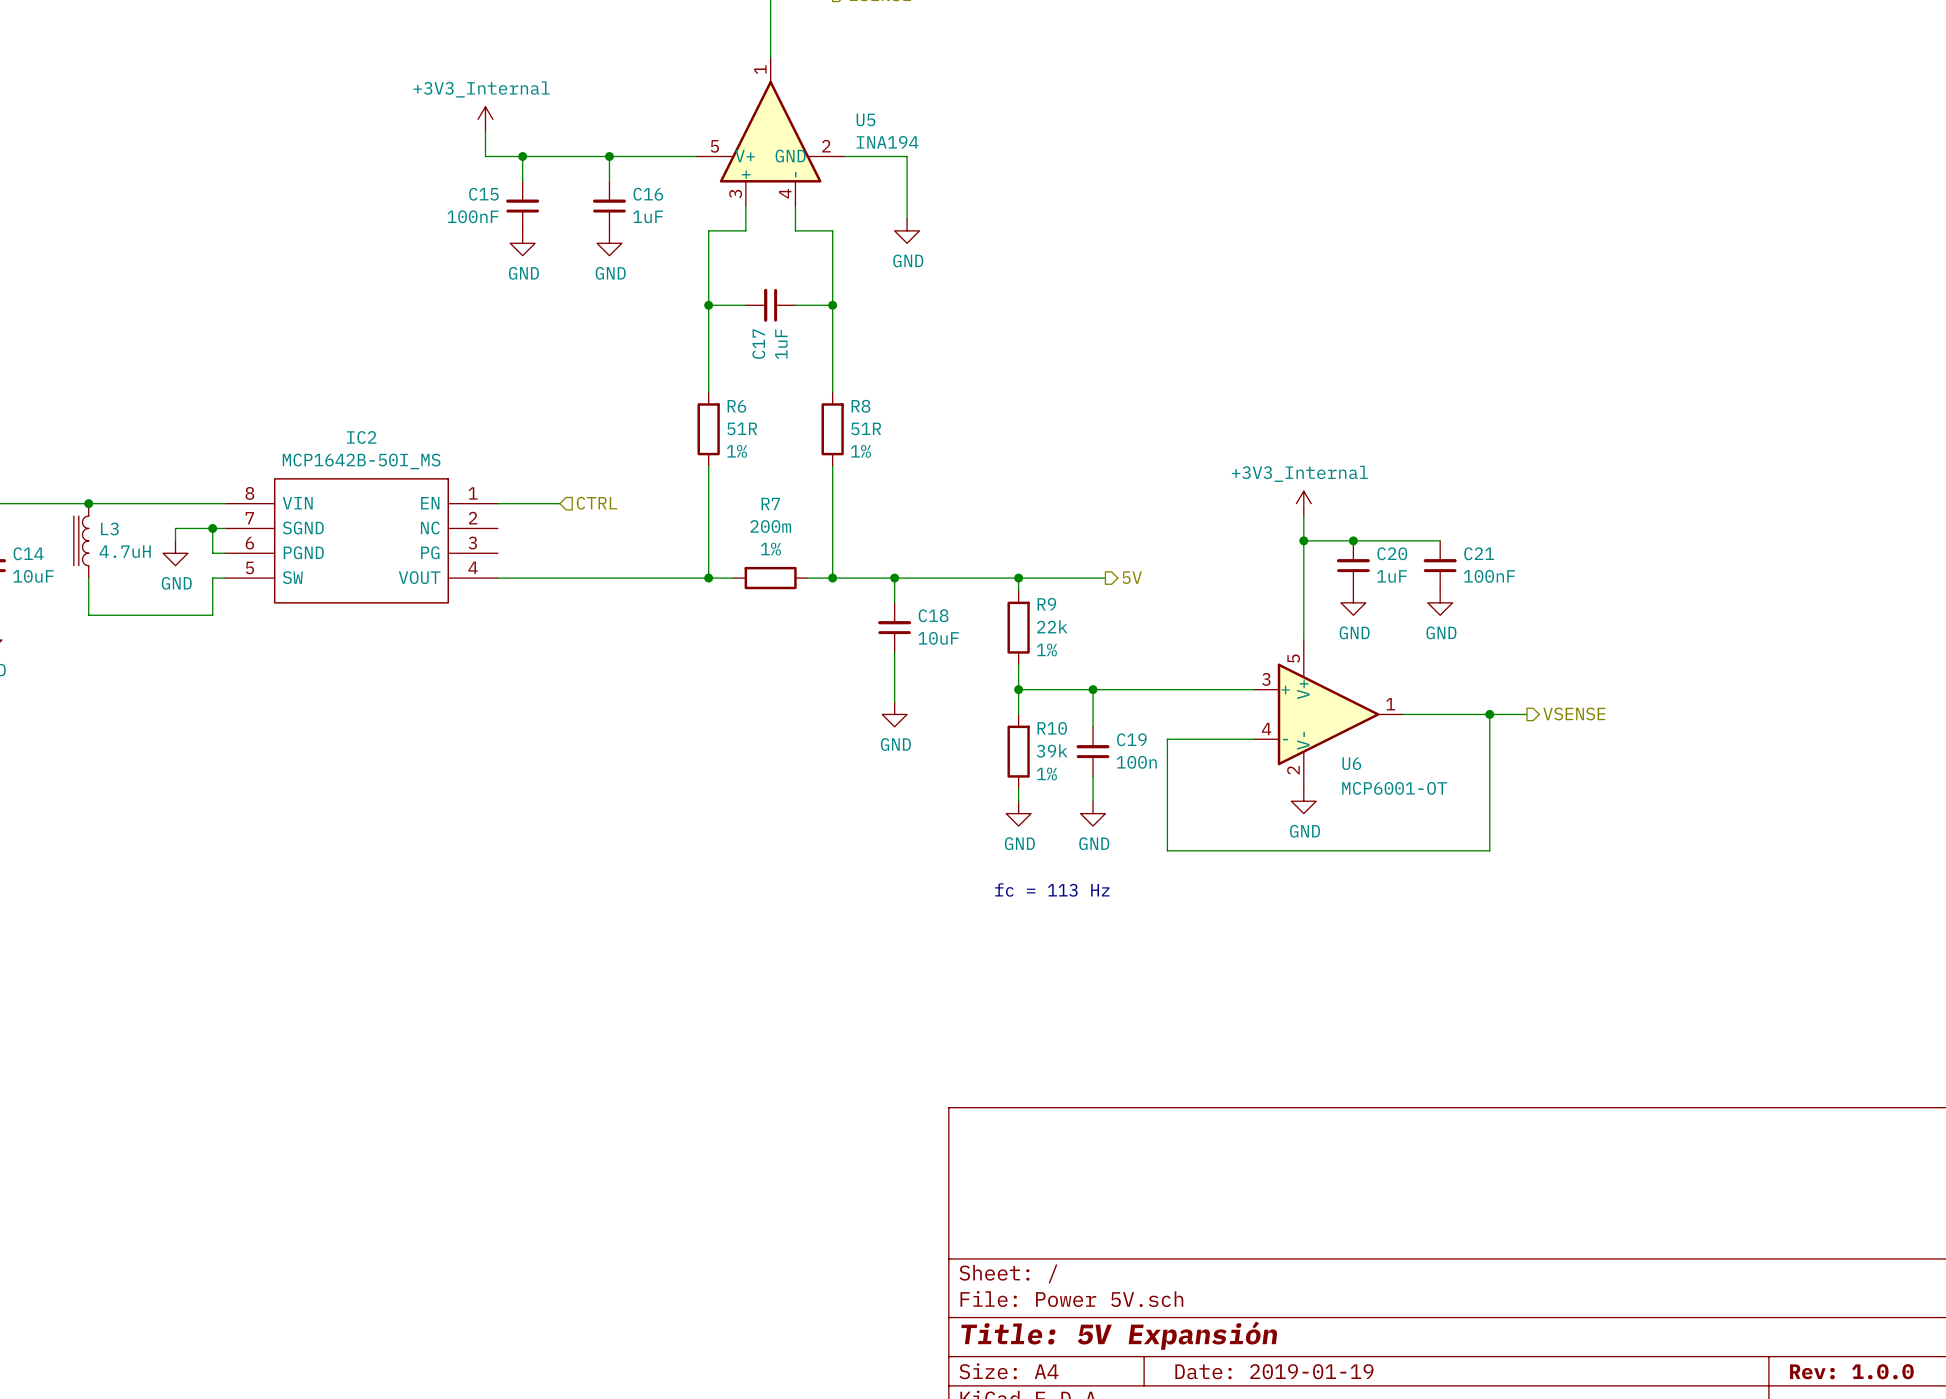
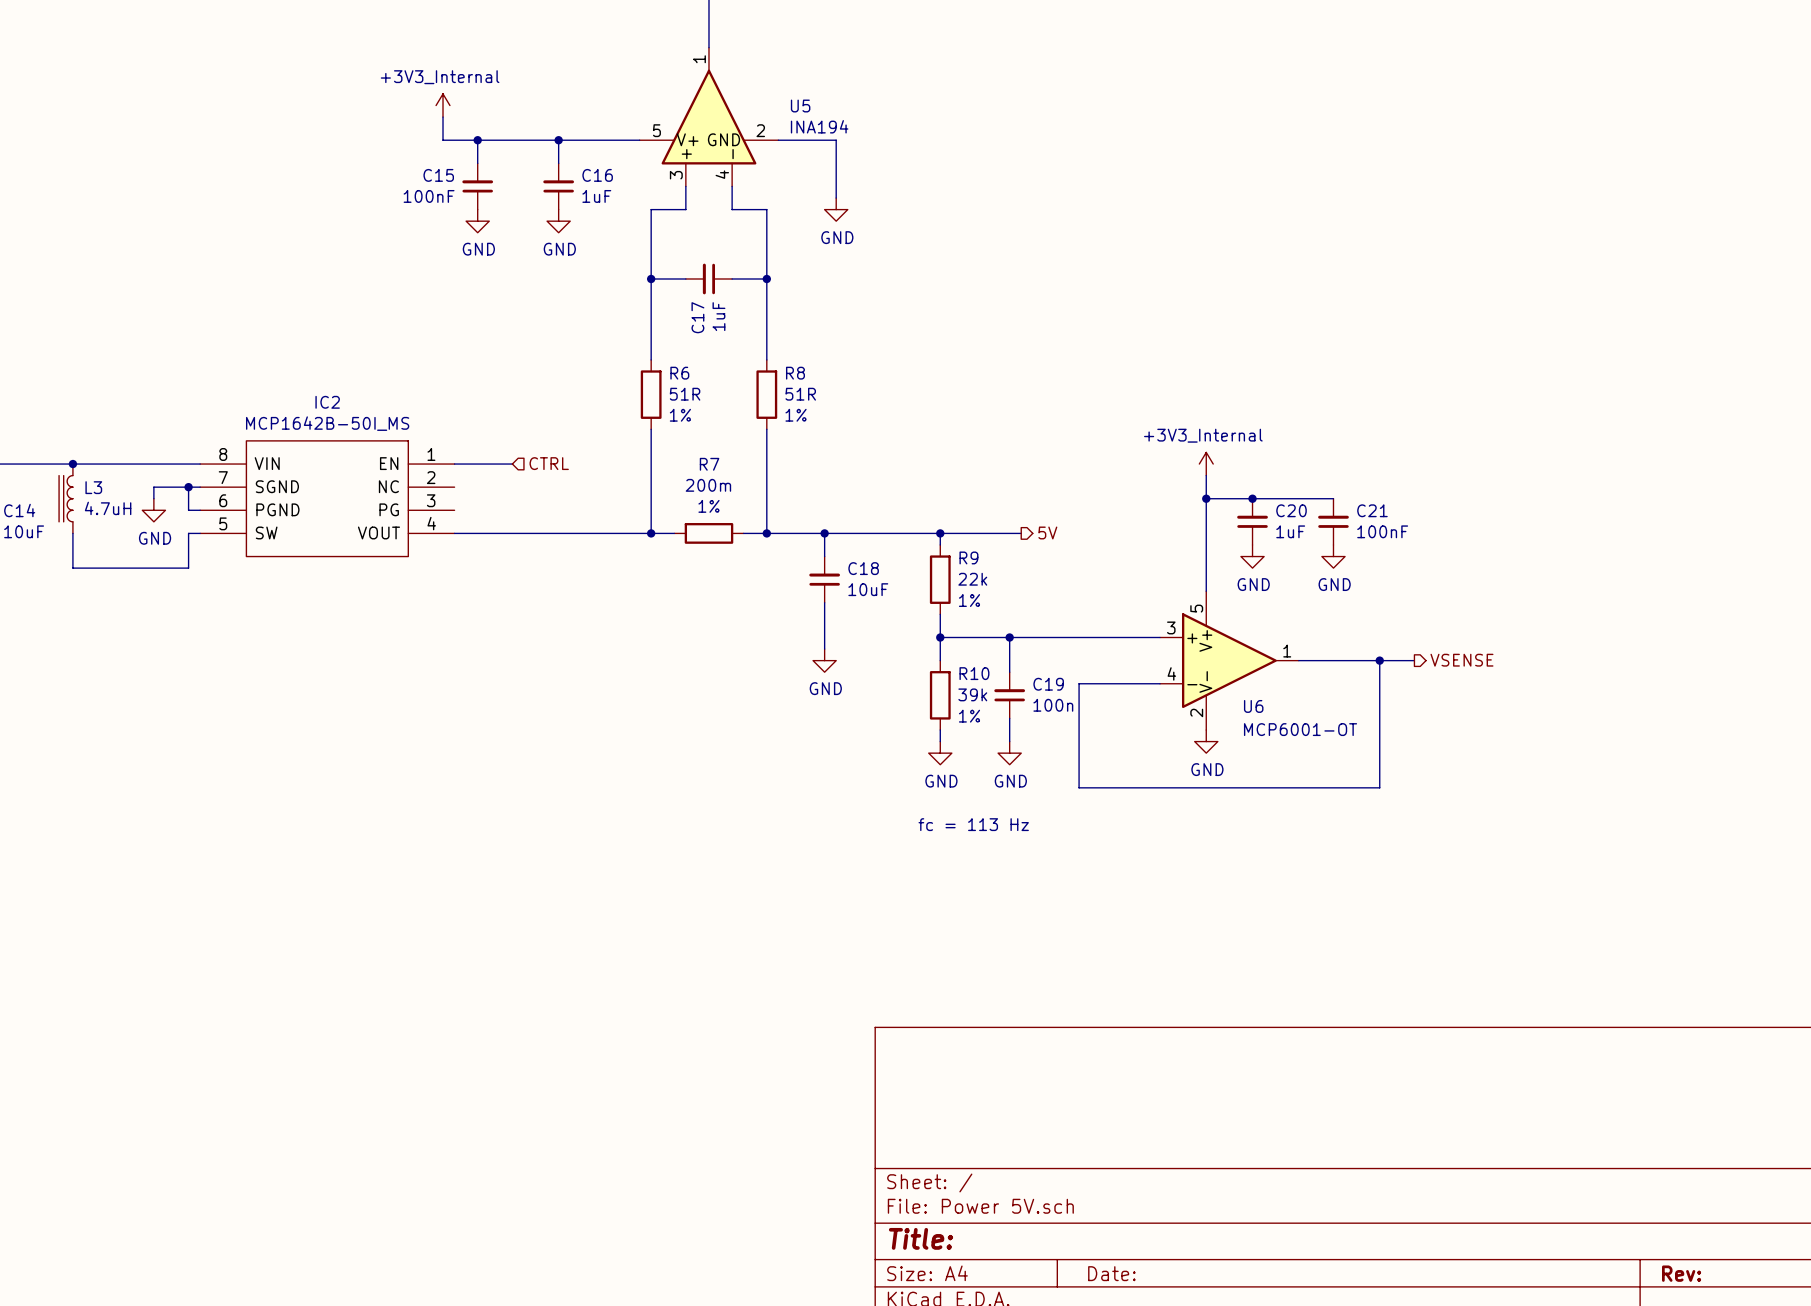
title block: Title: 5V Expansión (1119, 1335) -> Title: (921, 1238)
title block: Date: 2019-01-19 (1274, 1371) -> Date: (1111, 1273)
title block: Rev: 1.0.0 (1851, 1371) -> Rev: (1681, 1273)

